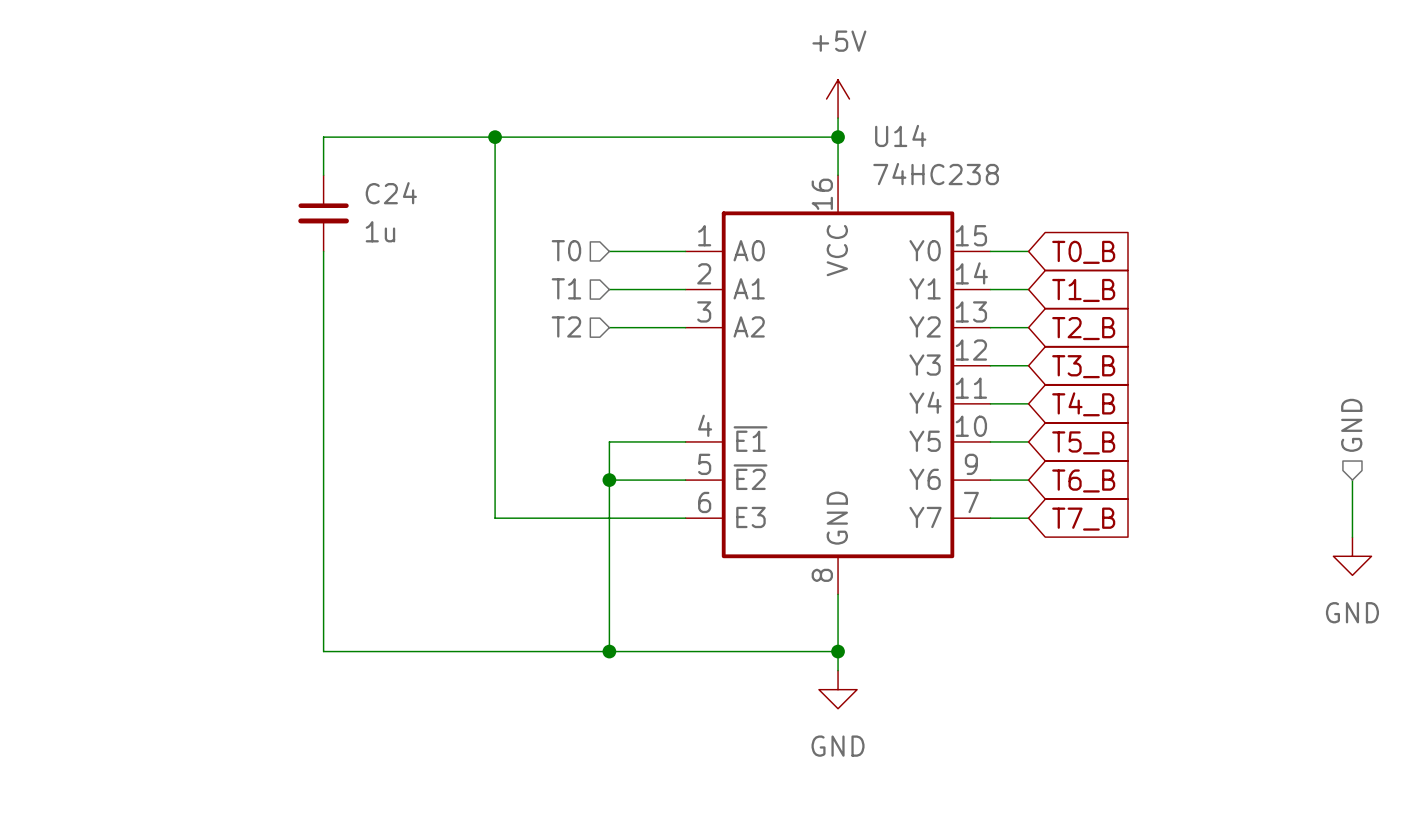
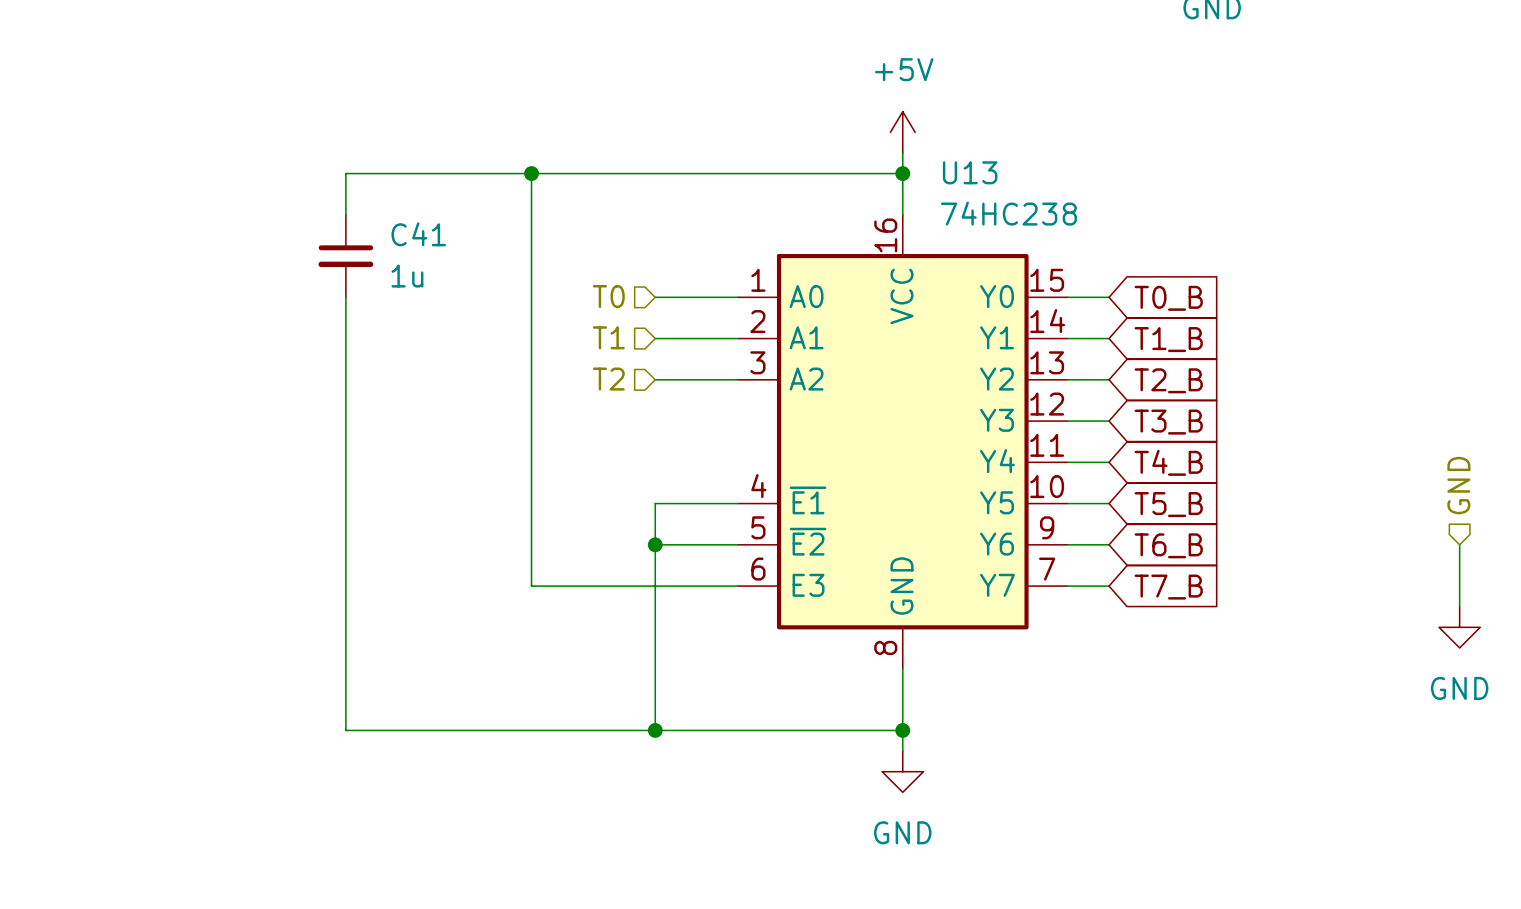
U14 name: U14 (900, 135) -> U13 (970, 172)
C24 name: C24 (391, 193) -> C41 (418, 234)

